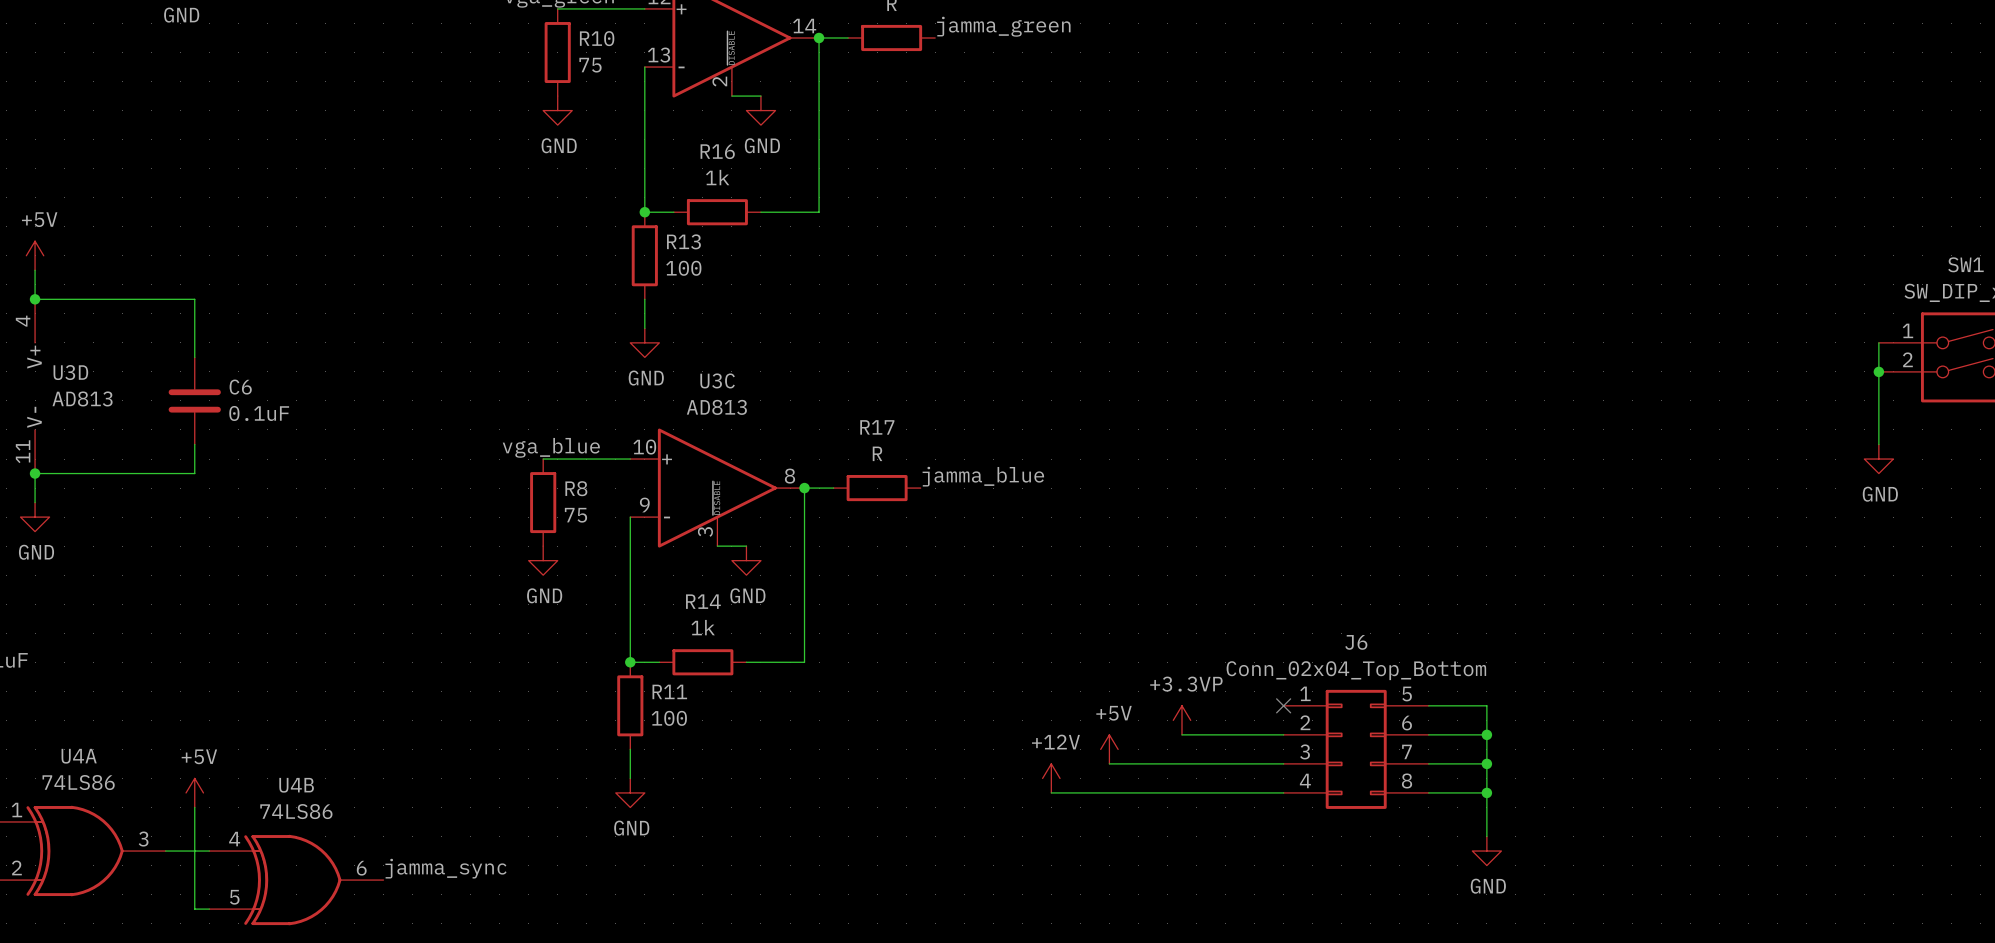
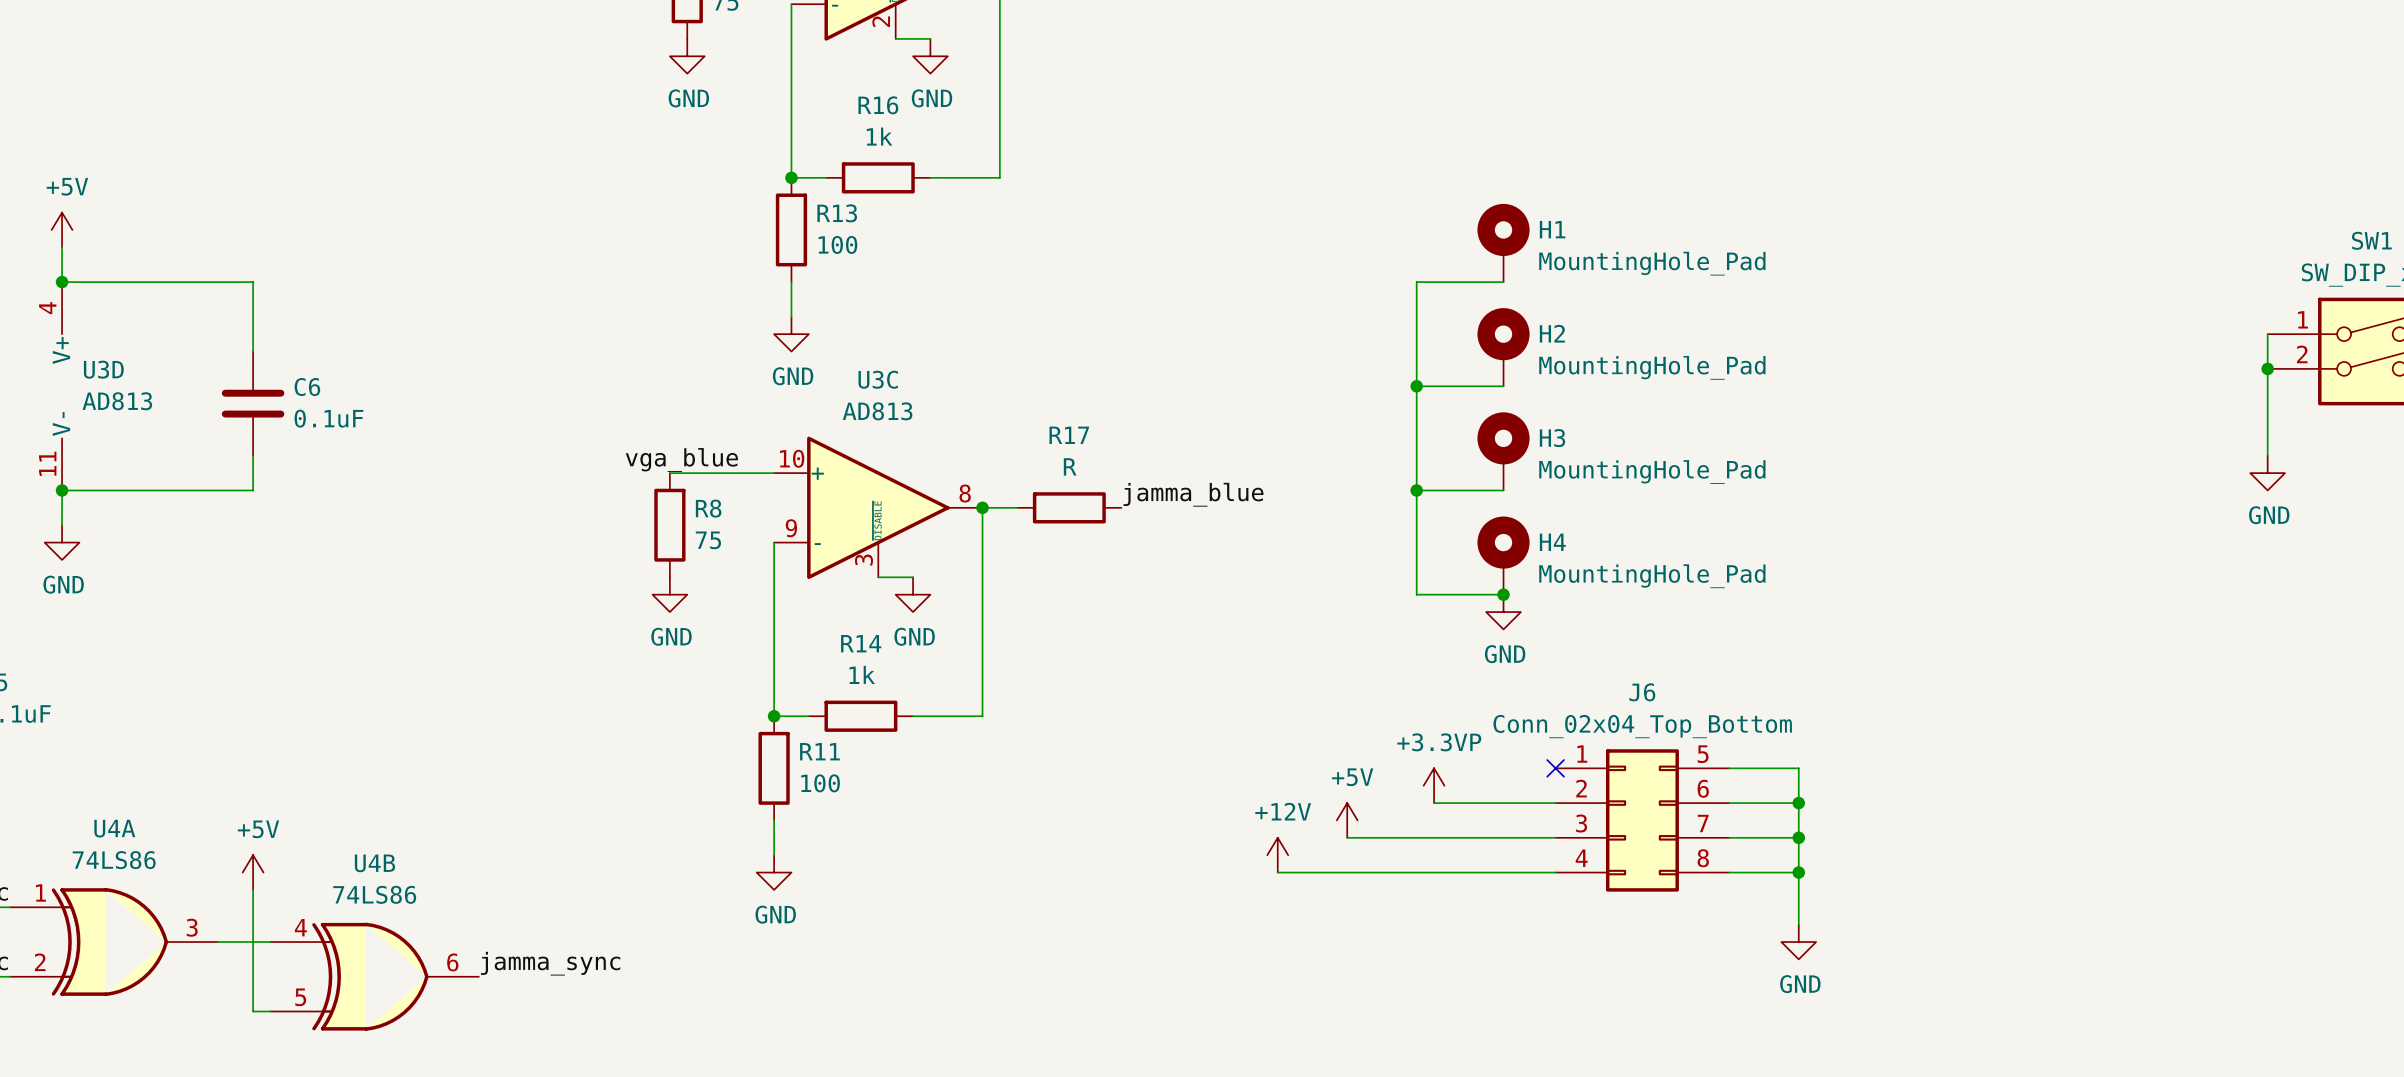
H1: none -> MountingHole_Pad (1503, 242)
wire: none -> (1503, 282) (1416, 282) (1416, 594) (1503, 594)
H2: none -> MountingHole_Pad (1503, 347)
wire: none -> (1416, 386) (1503, 386)
junction: none -> (1416, 386)
H3: none -> MountingHole_Pad (1503, 451)
wire: none -> (1416, 490) (1503, 490)
junction: none -> (1416, 490)
H4: none -> MountingHole_Pad (1503, 555)
junction: none -> (1503, 594)
power symbol: none -> GND (1503, 612)

